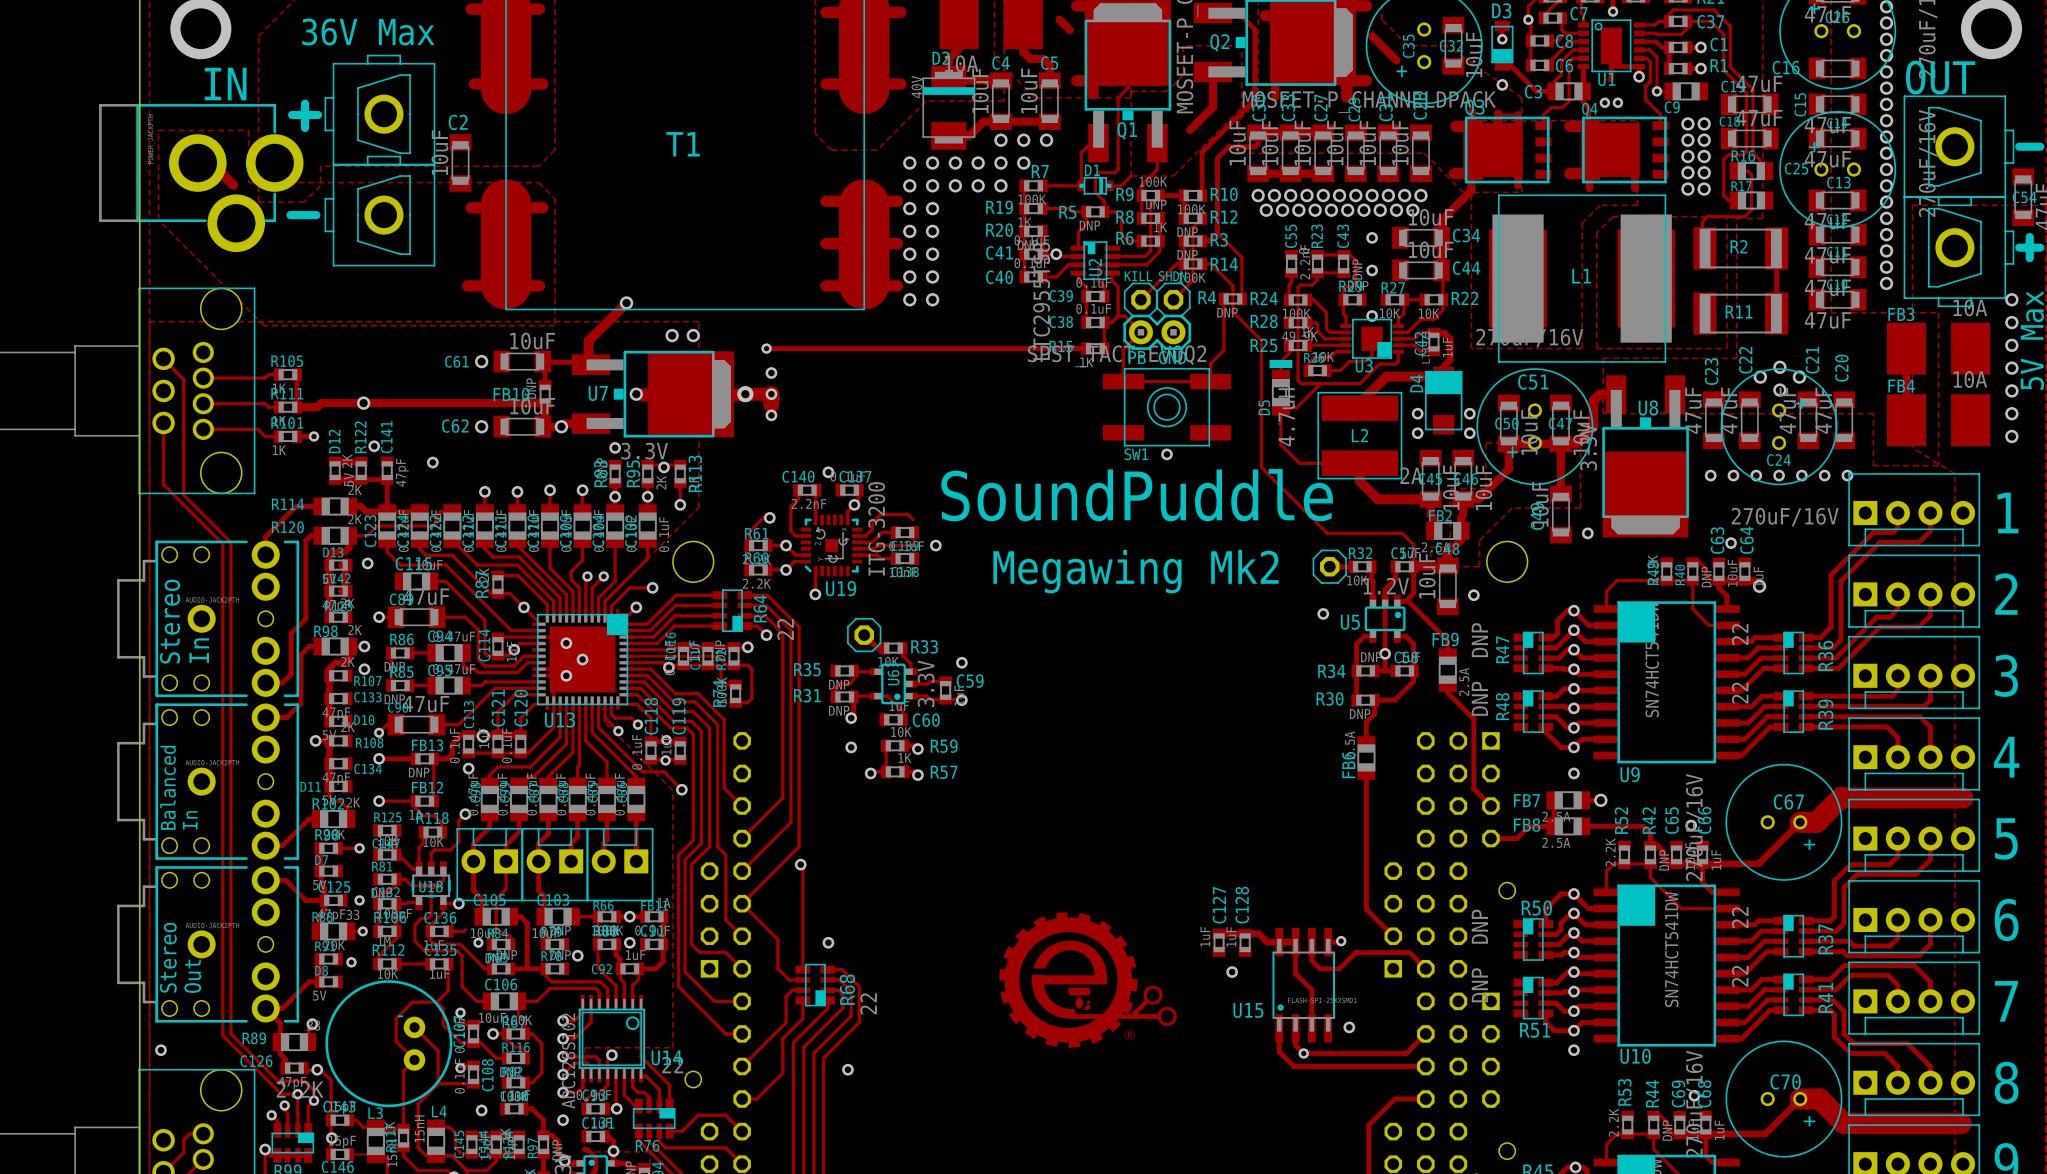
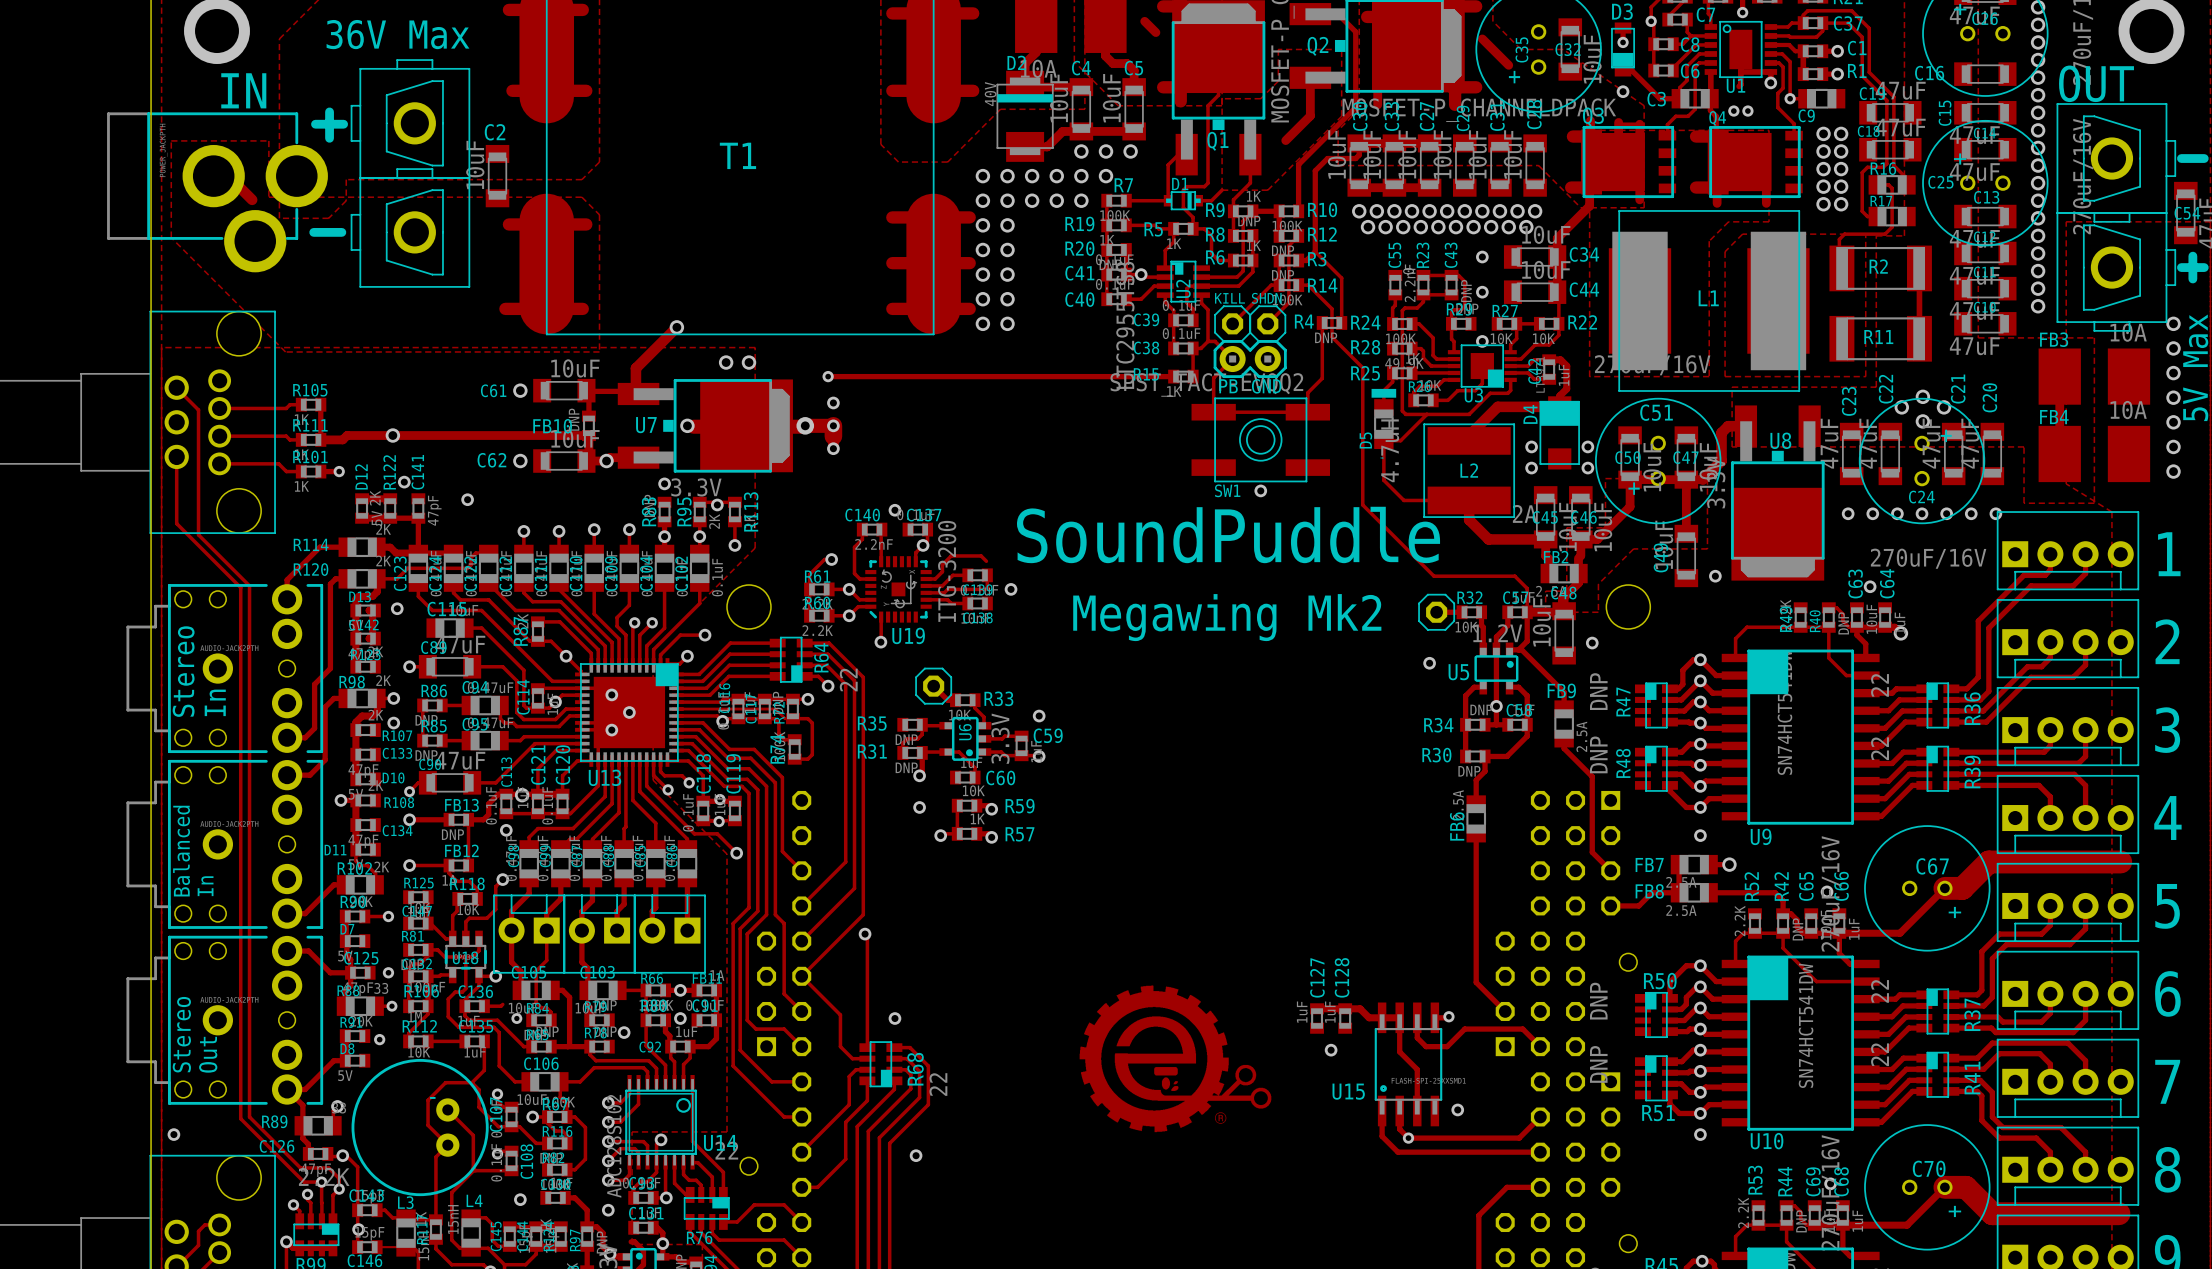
R9 value: 100K (1153, 181) -> 1K (1253, 196)
R5 value: DNP (1089, 225) -> 1K (1174, 243)

